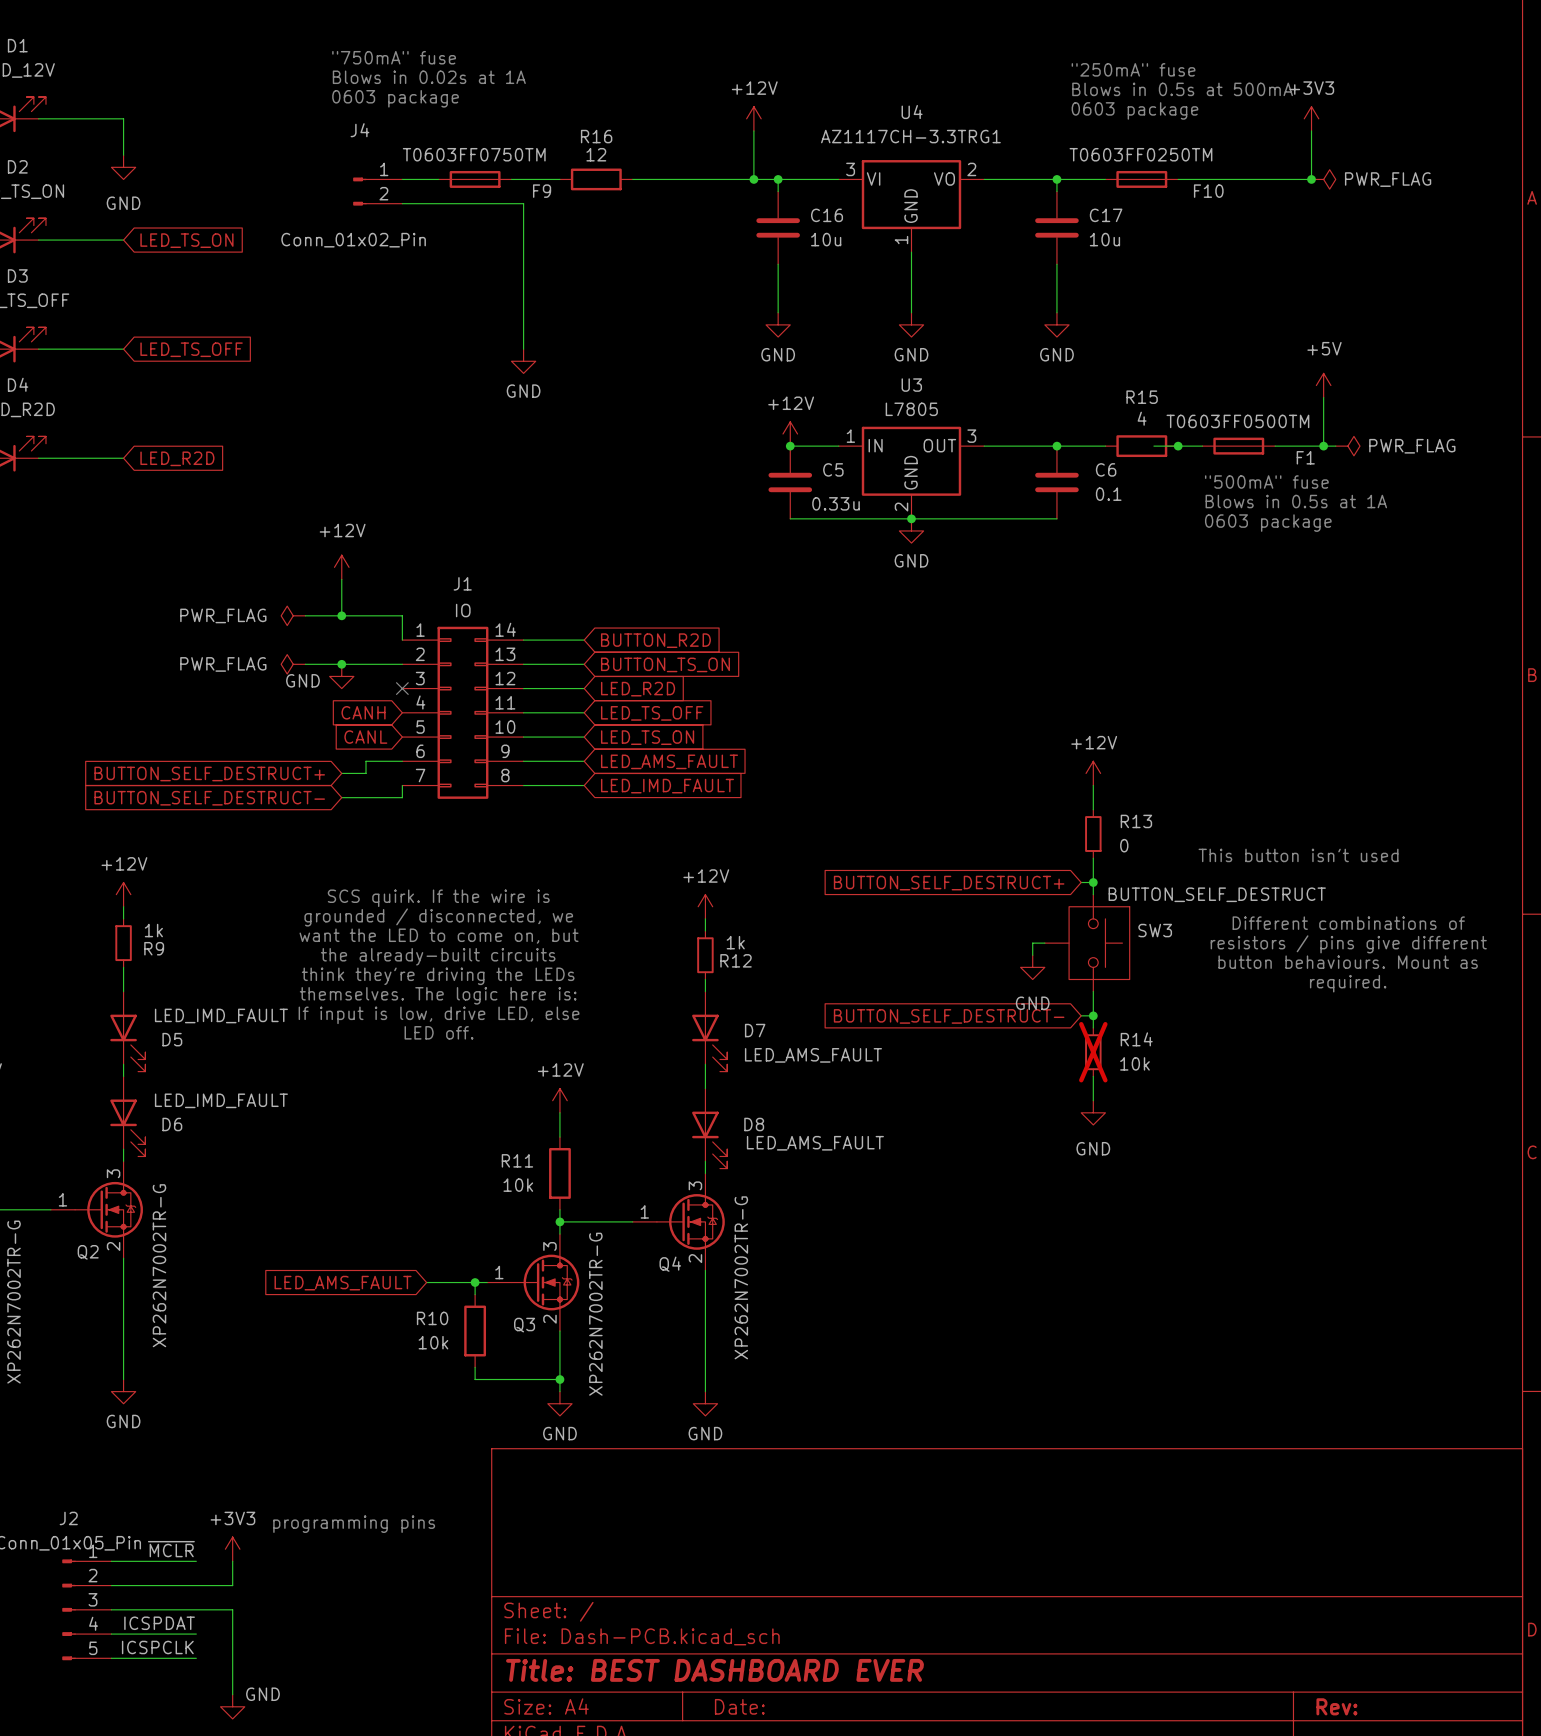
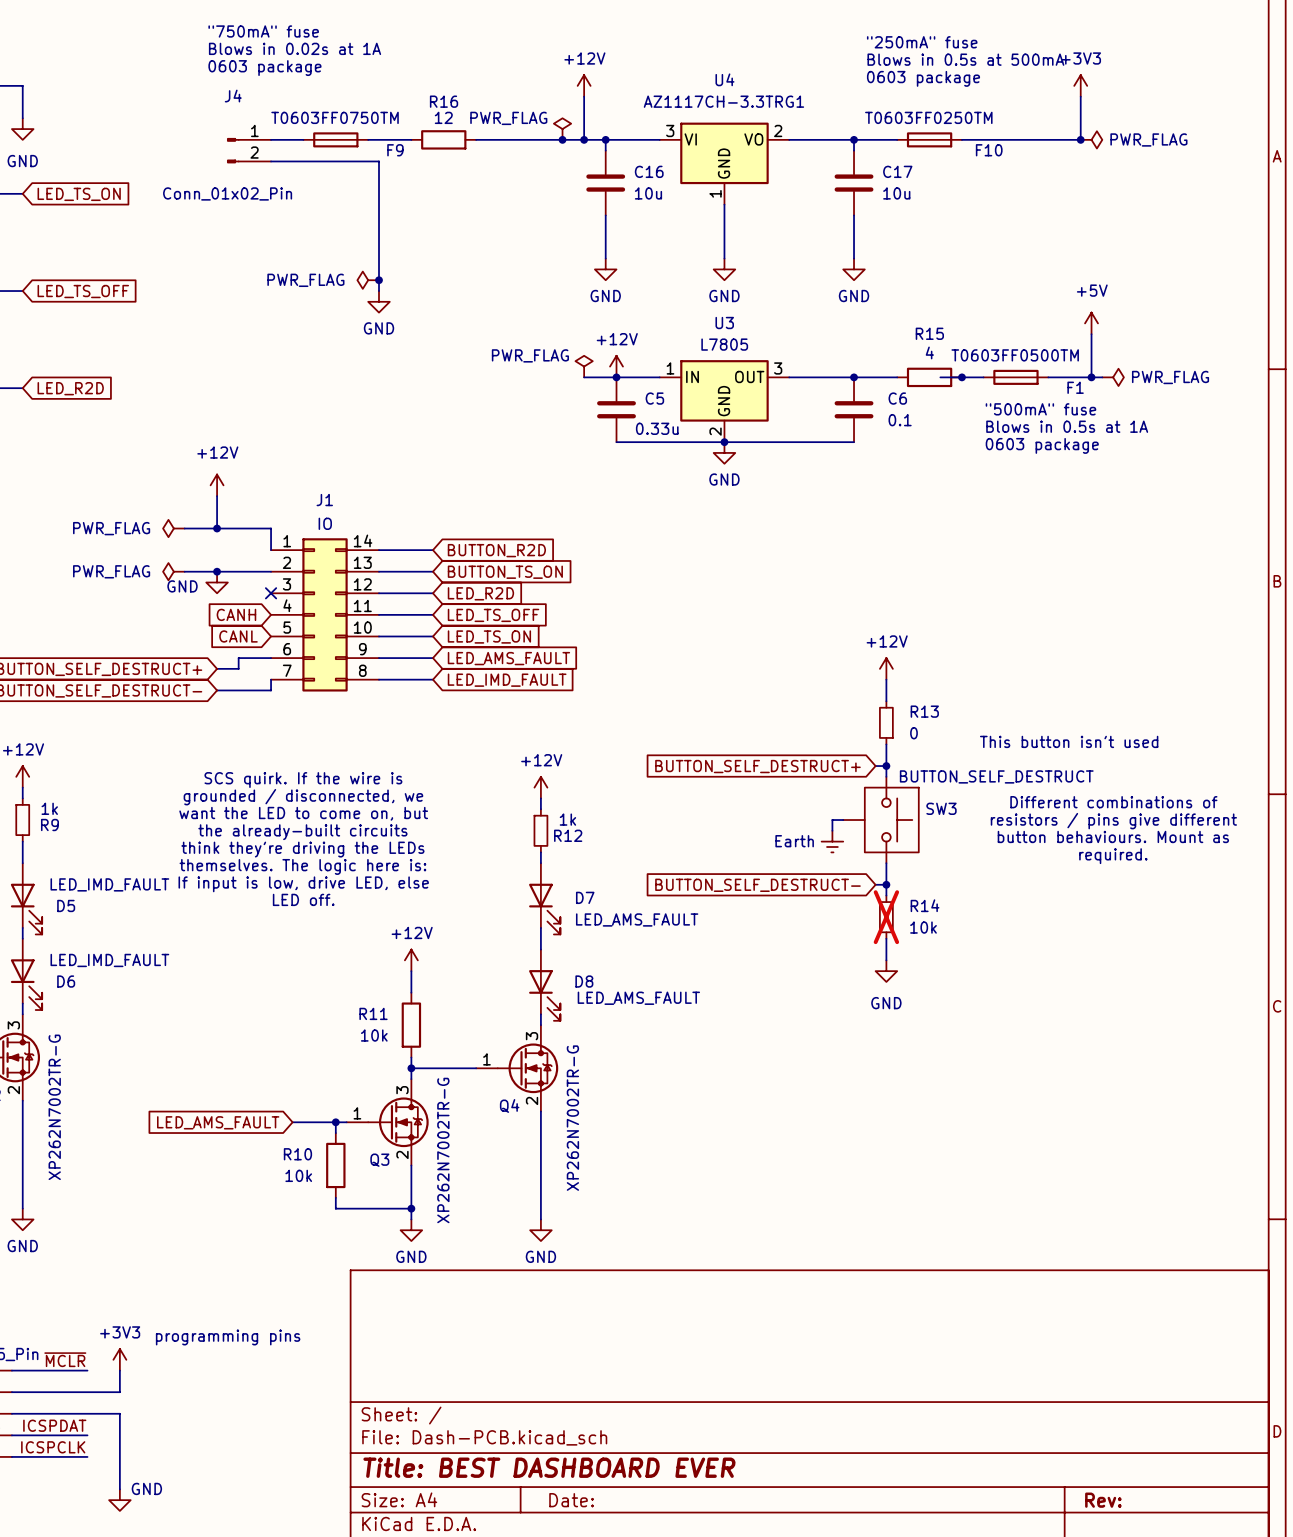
power symbol: none -> PWR_FLAG (562, 129)
junction: none -> (562, 139)
power symbol: none -> PWR_FLAG (368, 280)
junction: none -> (378, 280)
power symbol: none -> PWR_FLAG (584, 366)
wire: none -> (584, 377) (616, 377)
power symbol: GND (1032, 967) -> Earth (832, 841)

